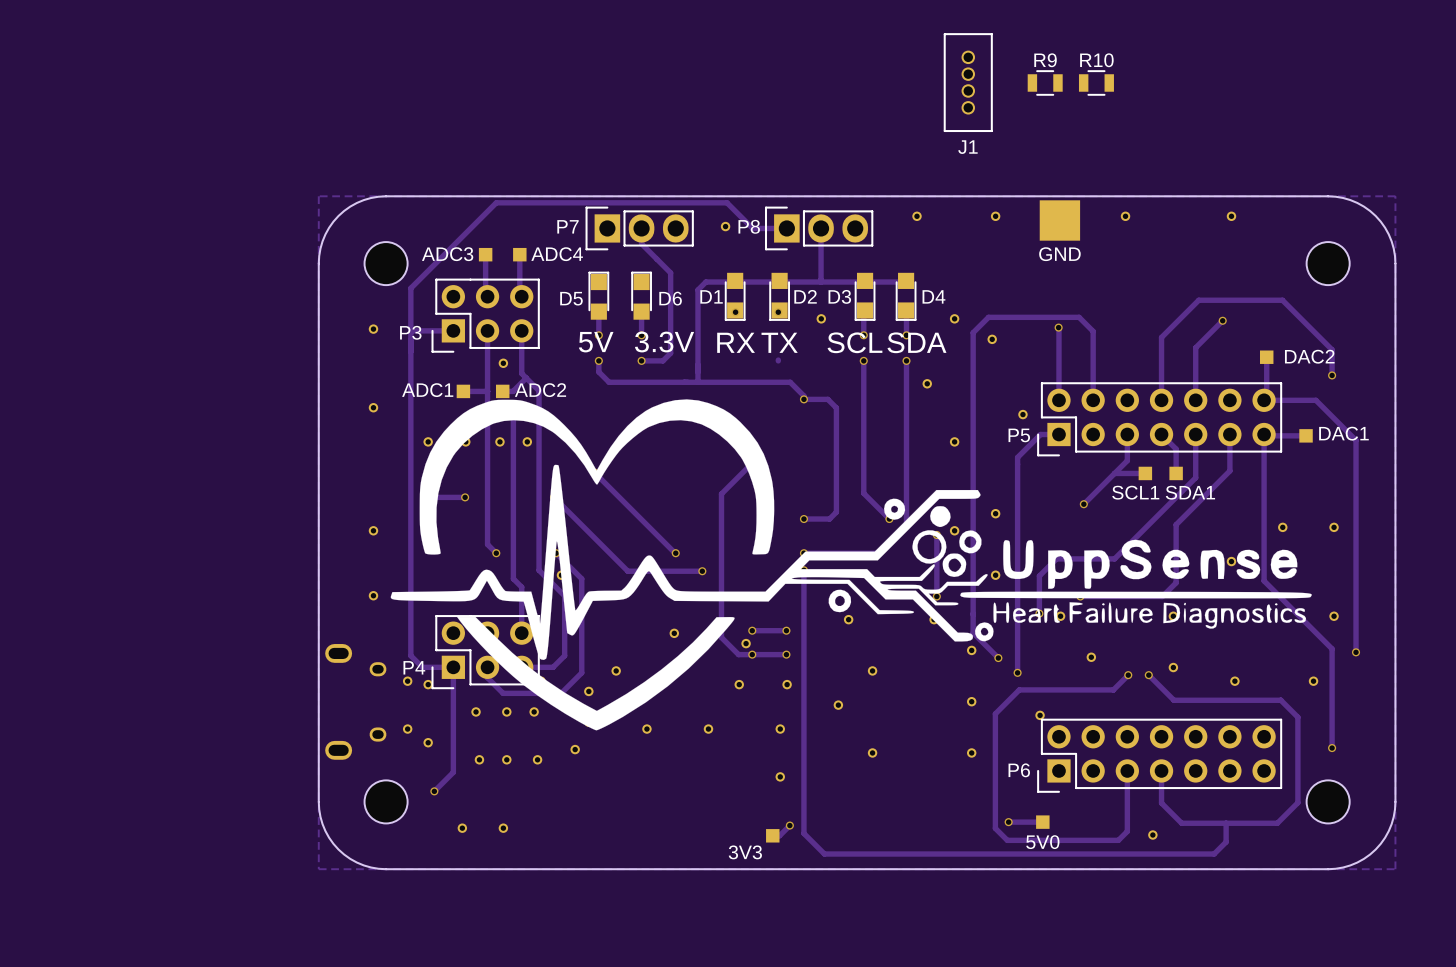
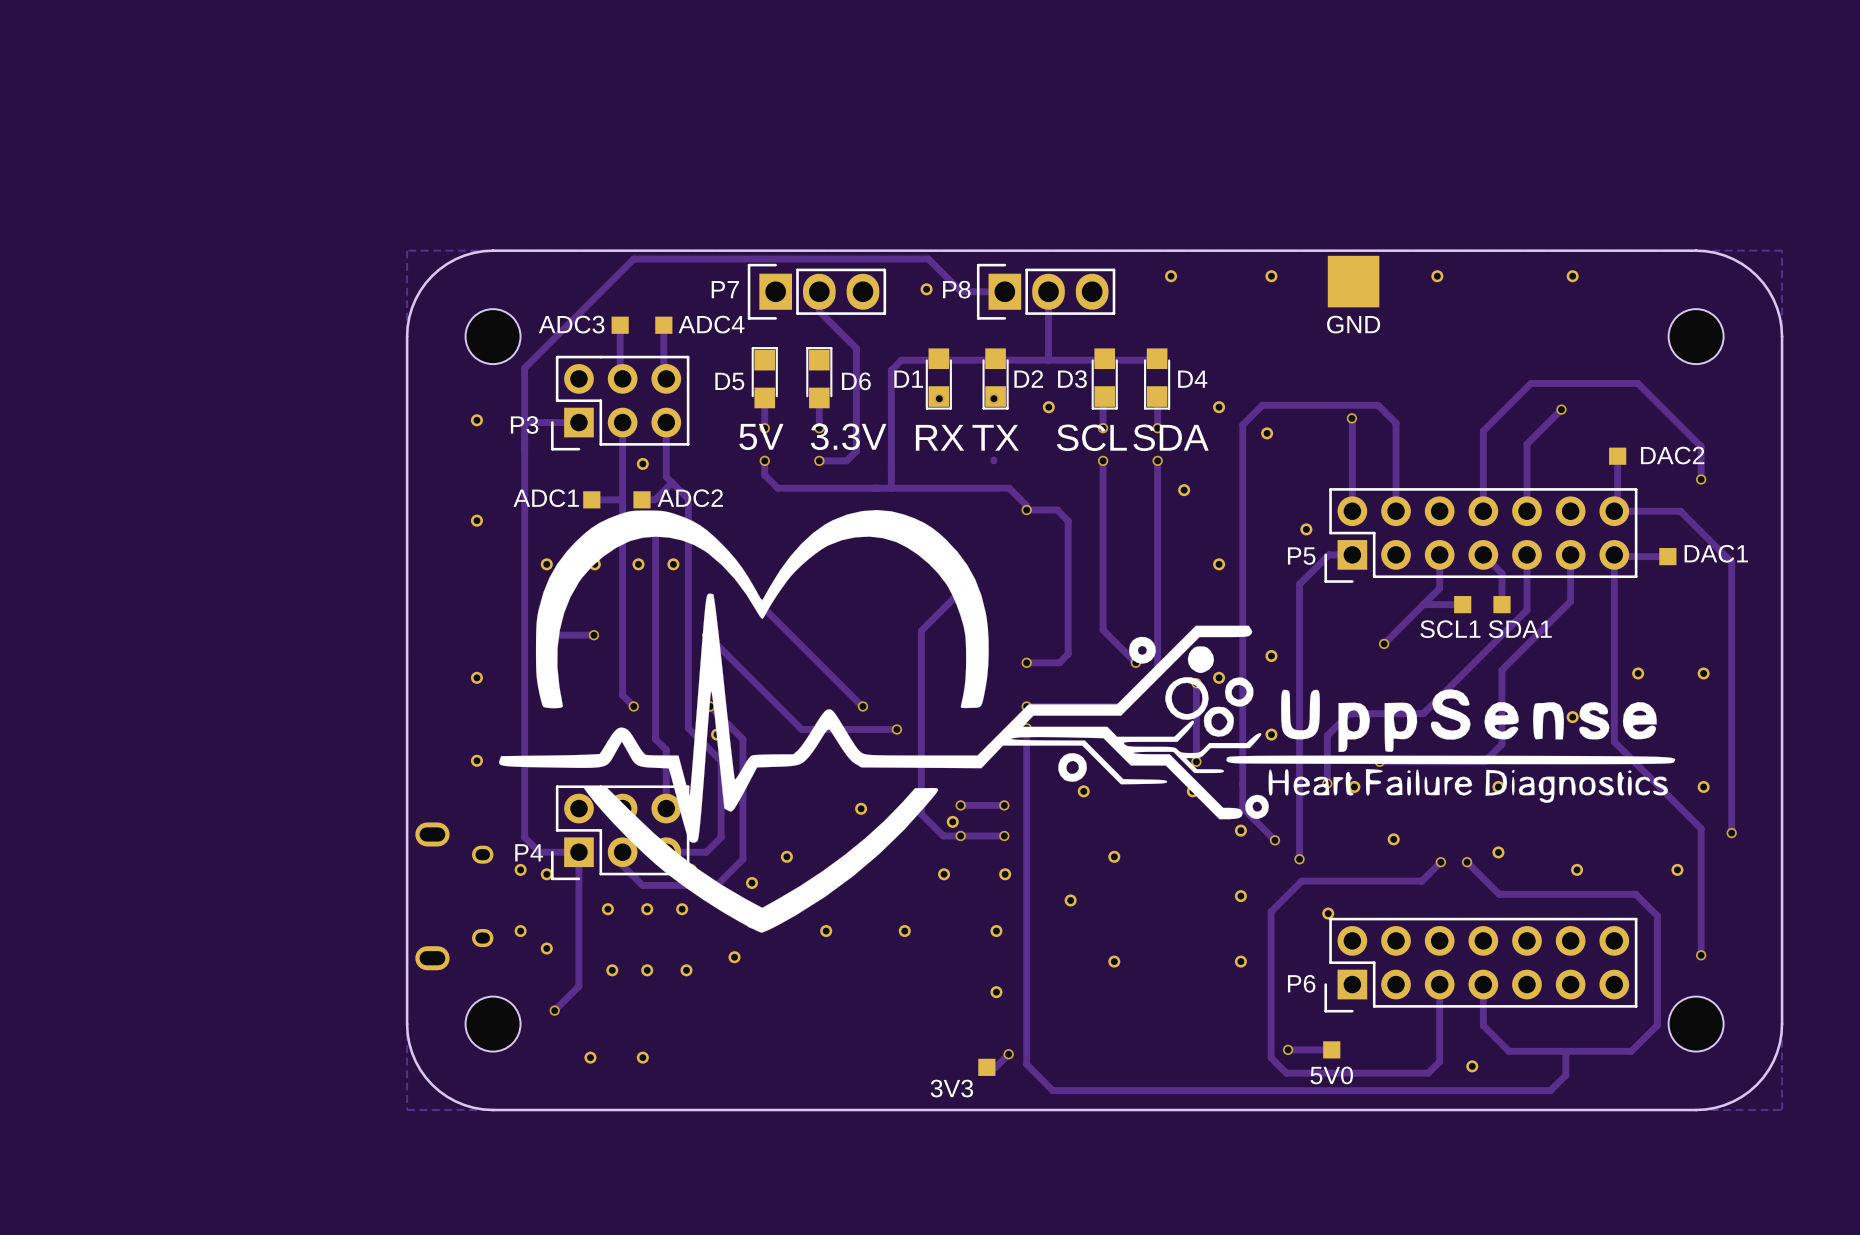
J1: (968, 82) -> none
R9: (1045, 82) -> none
R10: (1096, 82) -> none

